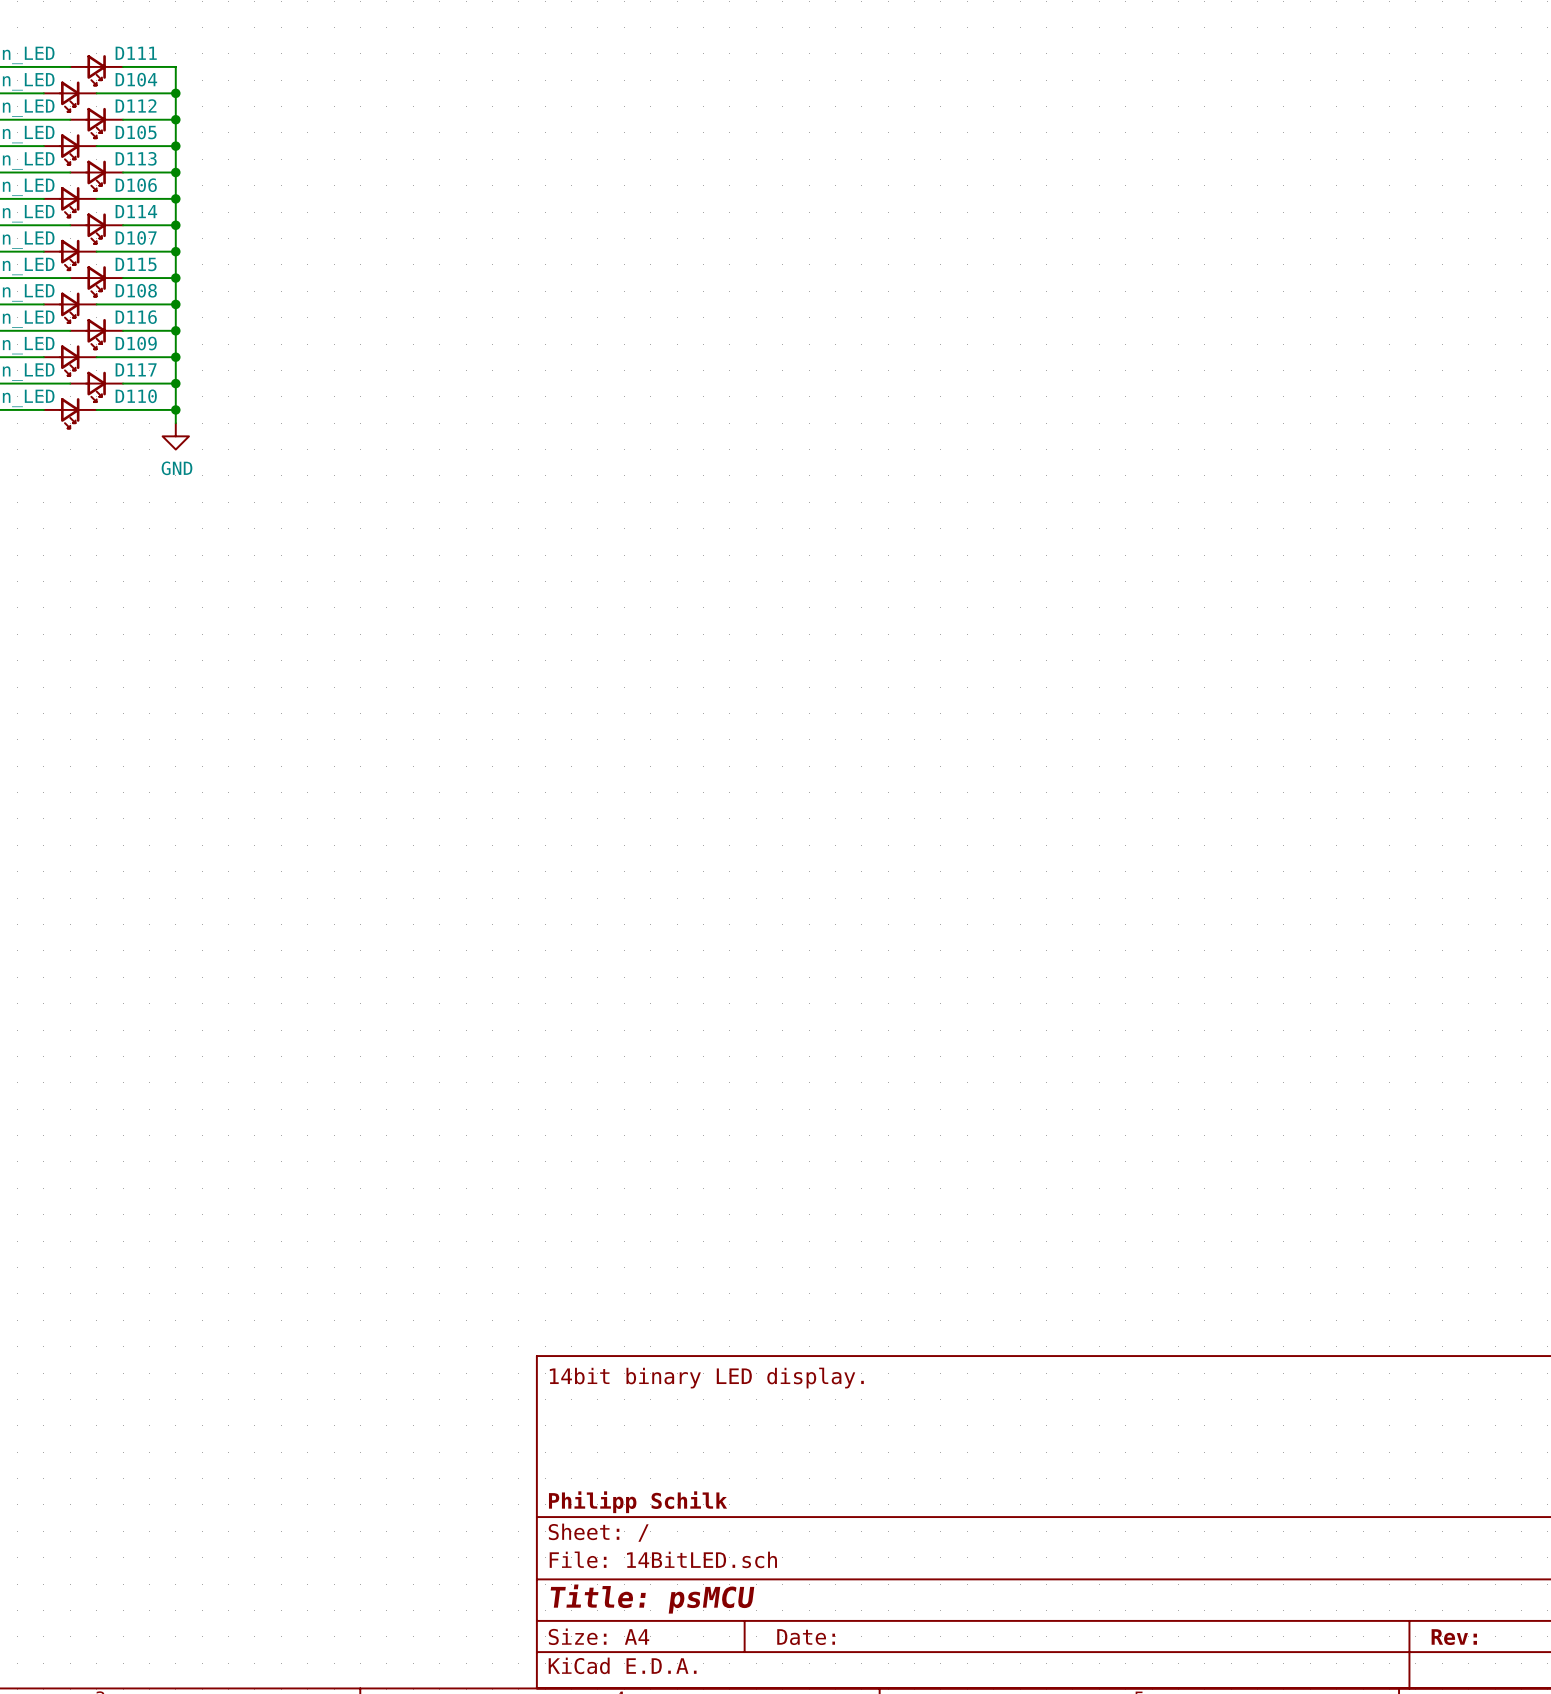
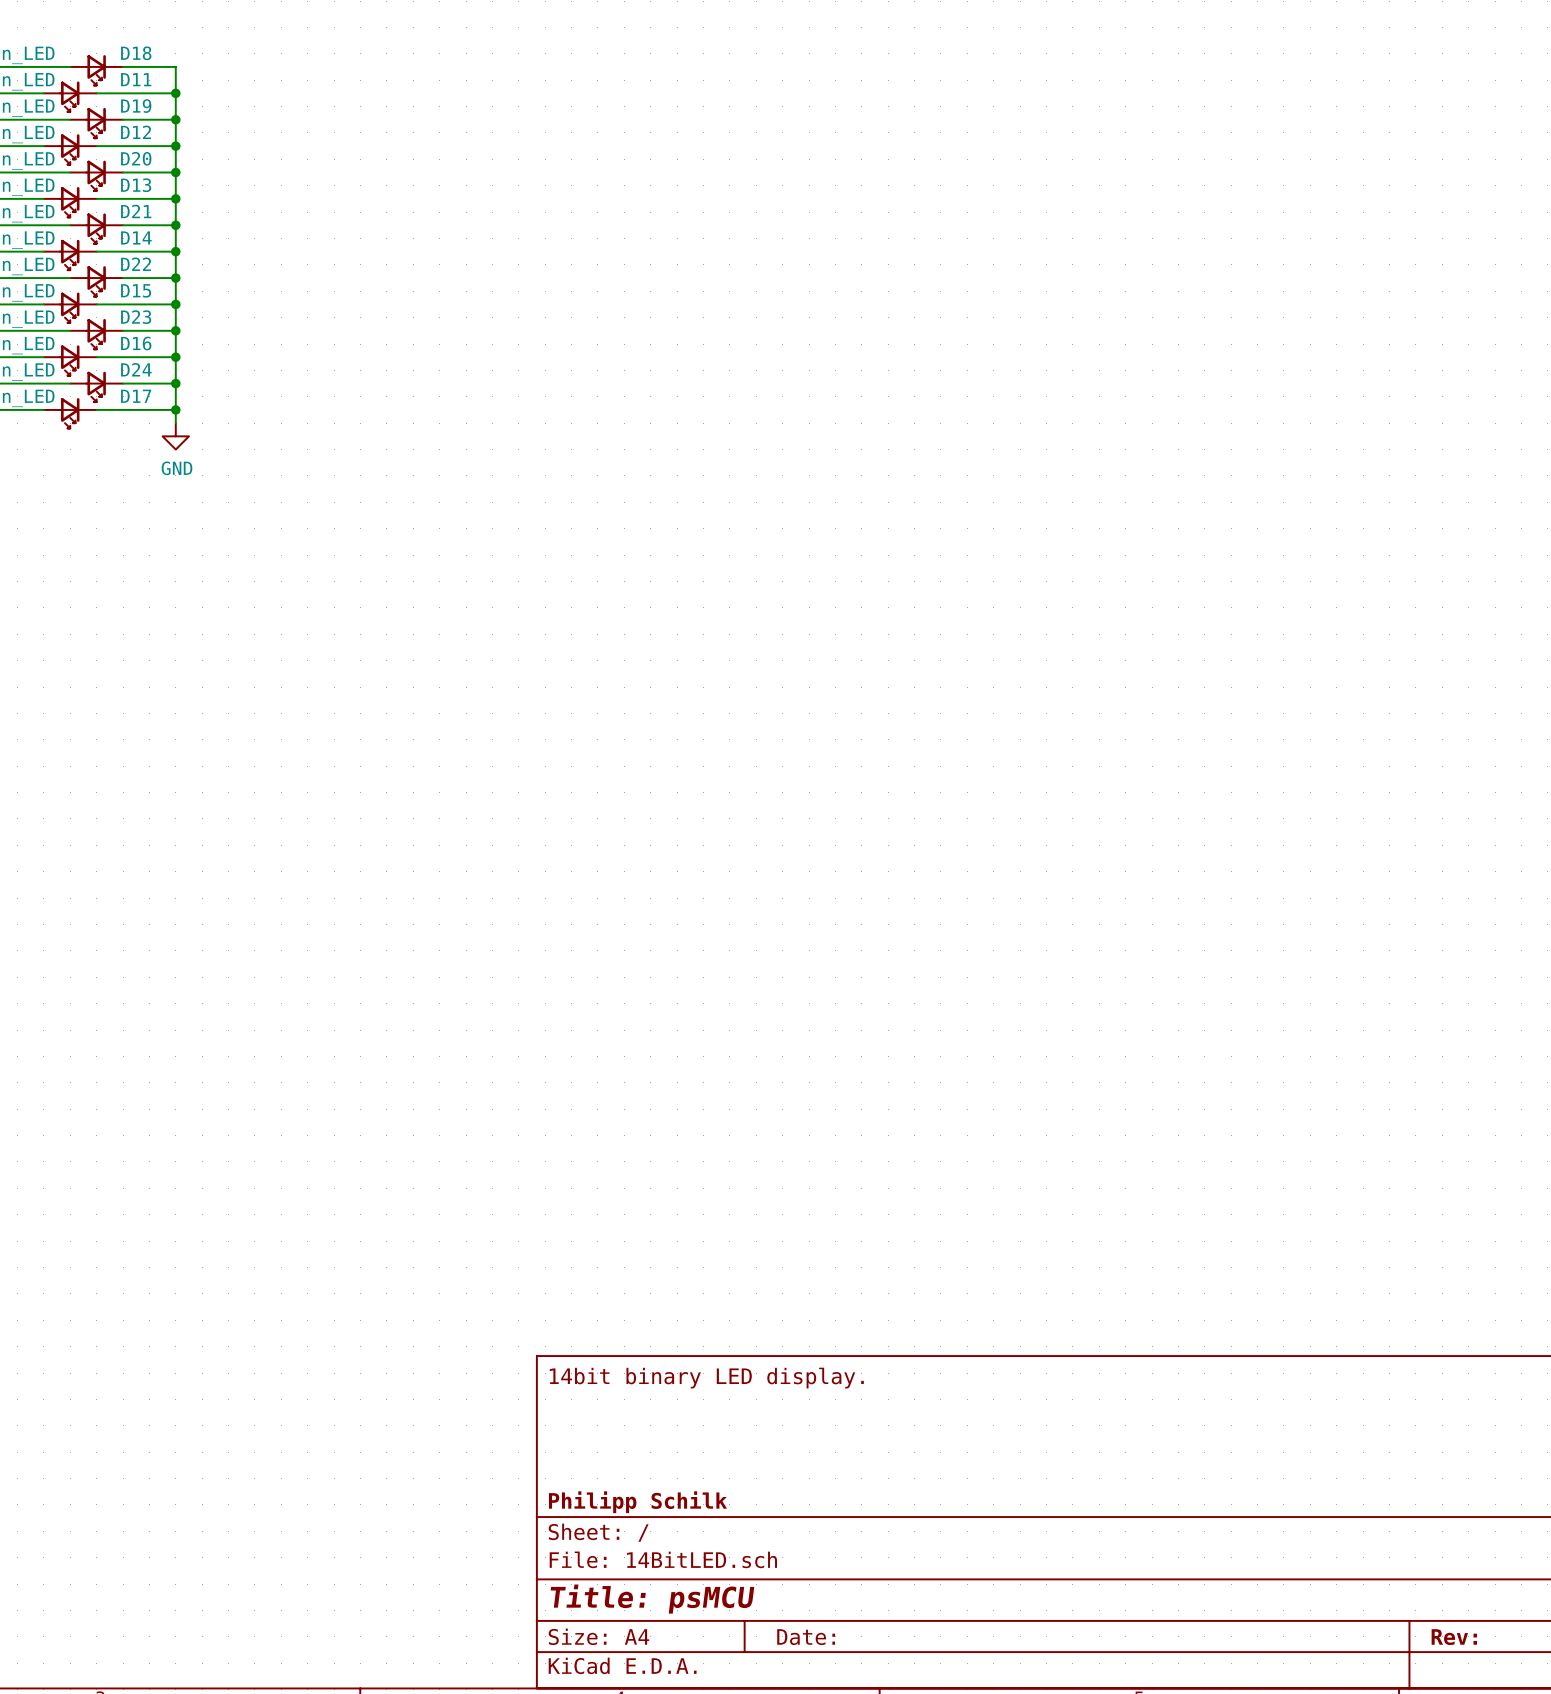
D111 name: D111 (136, 53) -> D18 (136, 53)
D104 name: D104 (136, 79) -> D11 (136, 79)
D112 name: D112 (136, 105) -> D19 (136, 106)
D105 name: D105 (136, 132) -> D12 (136, 132)
D113 name: D113 (136, 158) -> D20 (136, 158)
D106 name: D106 (136, 185) -> D13 (136, 185)
D114 name: D114 (136, 211) -> D21 (136, 211)
D107 name: D107 (136, 237) -> D14 (136, 237)
D115 name: D115 (136, 264) -> D22 (136, 264)
D108 name: D108 (136, 290) -> D15 (136, 290)
D116 name: D116 (136, 317) -> D23 (136, 317)
D109 name: D109 (136, 343) -> D16 (136, 343)
D117 name: D117 (136, 369) -> D24 (136, 369)
D110 name: D110 (136, 396) -> D17 (136, 396)

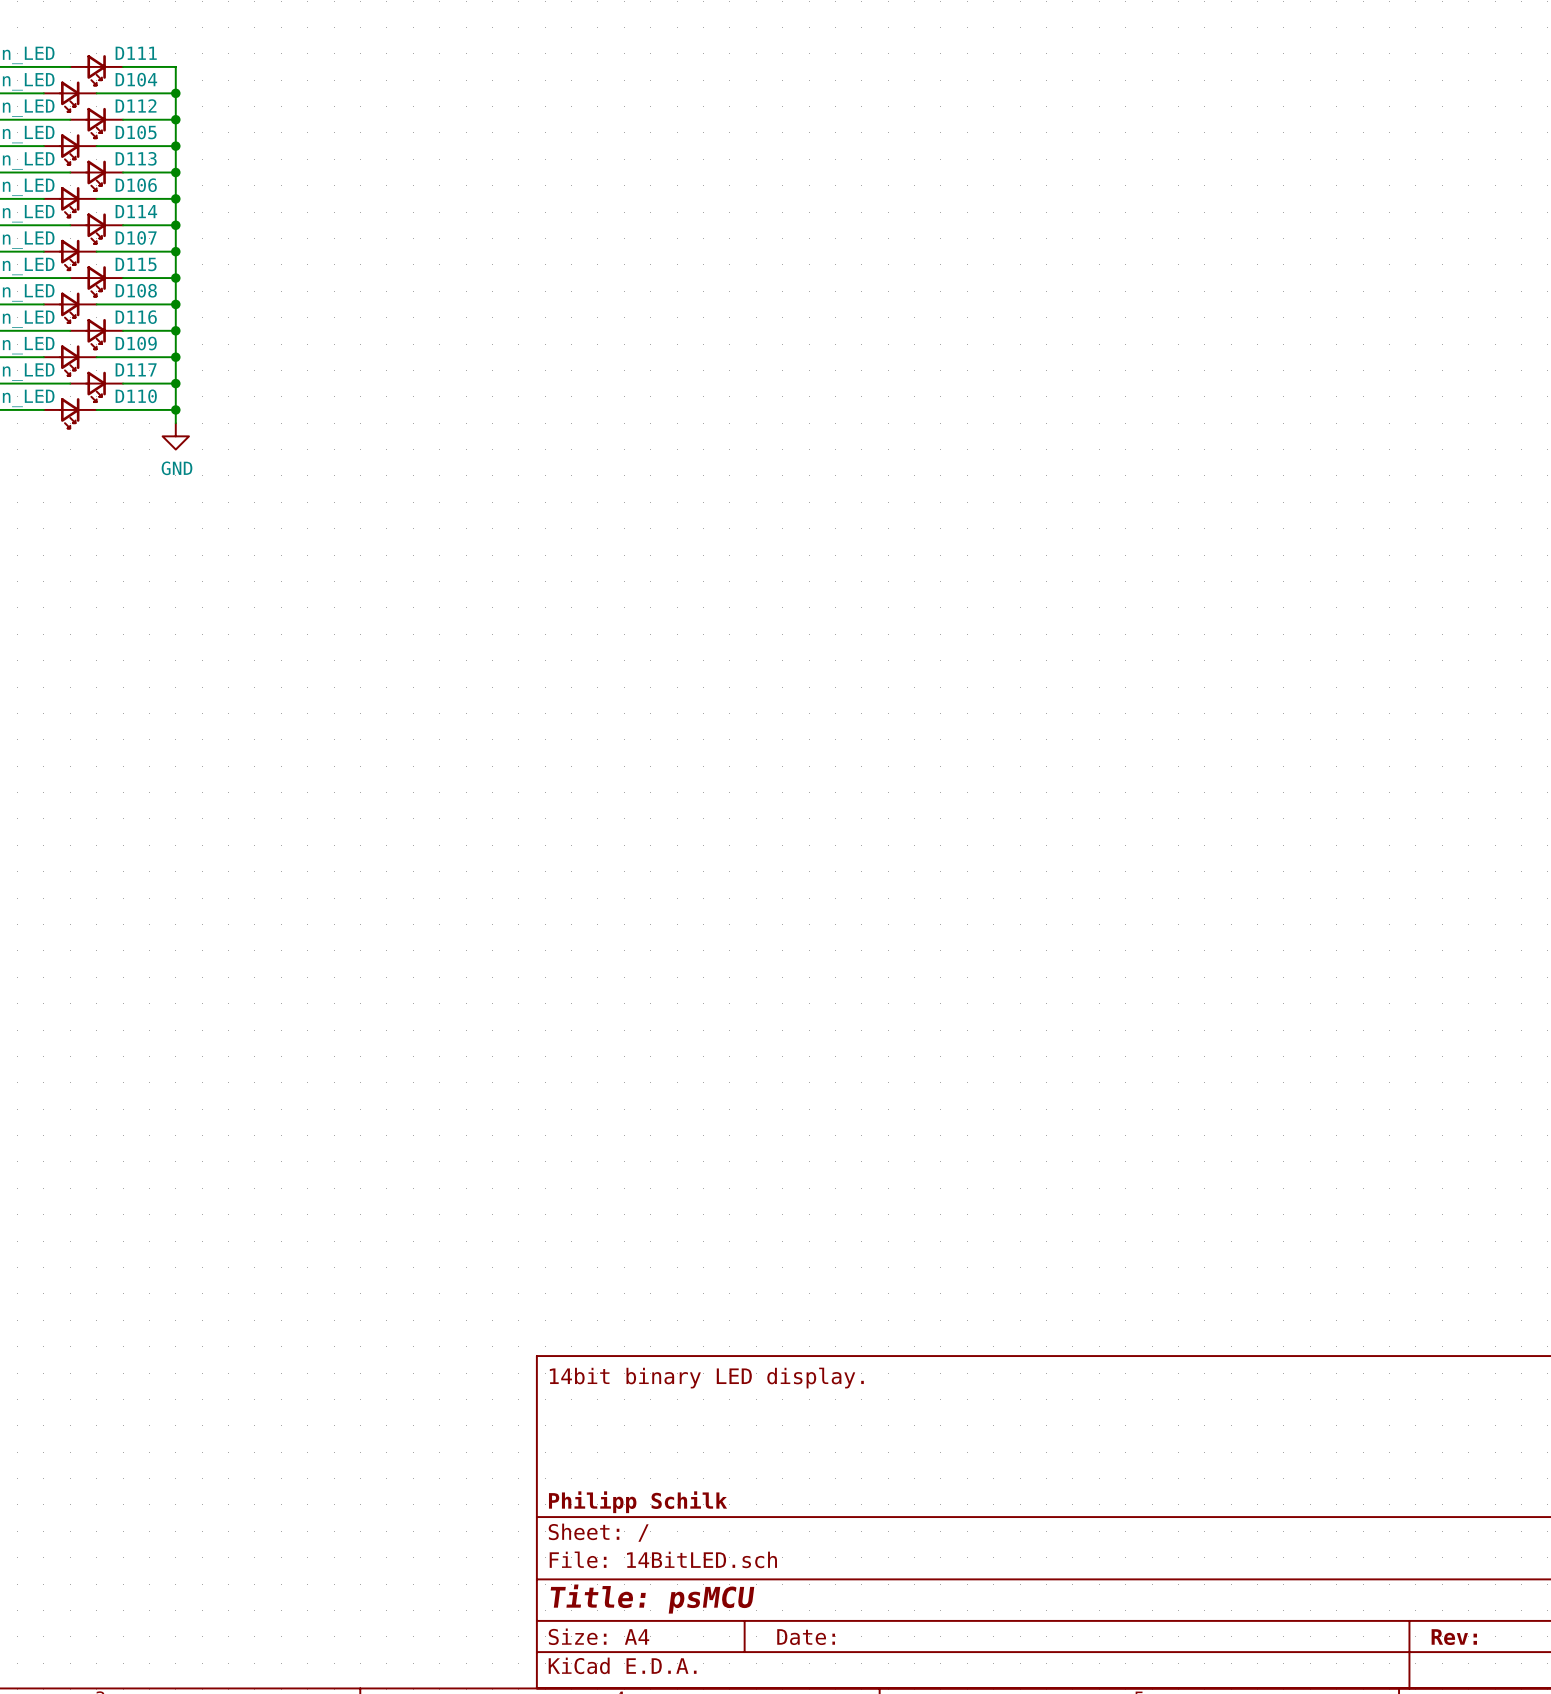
D18 name: D18 (136, 53) -> D111 (136, 53)
D11 name: D11 (136, 79) -> D104 (136, 79)
D19 name: D19 (136, 106) -> D112 (136, 105)
D12 name: D12 (136, 132) -> D105 (136, 132)
D20 name: D20 (136, 158) -> D113 (136, 158)
D13 name: D13 (136, 185) -> D106 (136, 185)
D21 name: D21 (136, 211) -> D114 (136, 211)
D14 name: D14 (136, 237) -> D107 (136, 237)
D22 name: D22 (136, 264) -> D115 (136, 264)
D15 name: D15 (136, 290) -> D108 (136, 290)
D23 name: D23 (136, 317) -> D116 (136, 317)
D16 name: D16 (136, 343) -> D109 (136, 343)
D24 name: D24 (136, 369) -> D117 (136, 369)
D17 name: D17 (136, 396) -> D110 (136, 396)

